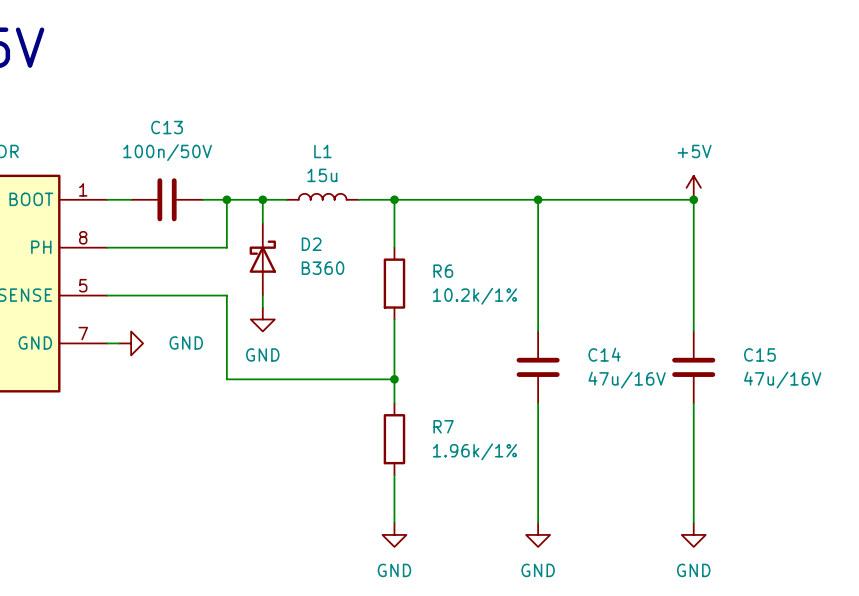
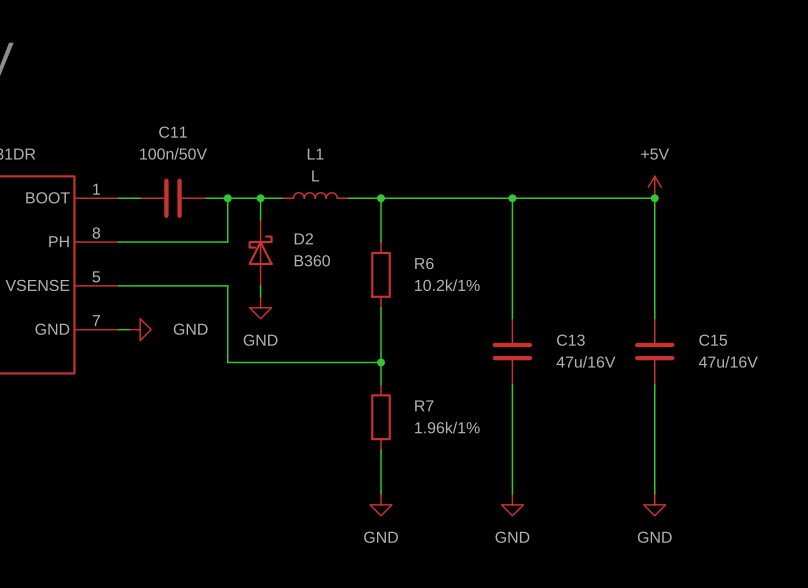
C13 name: C13 (167, 127) -> C11 (173, 132)
L1 value: 15u (322, 175) -> L (315, 175)
C14 name: C14 (604, 354) -> C13 (570, 340)

